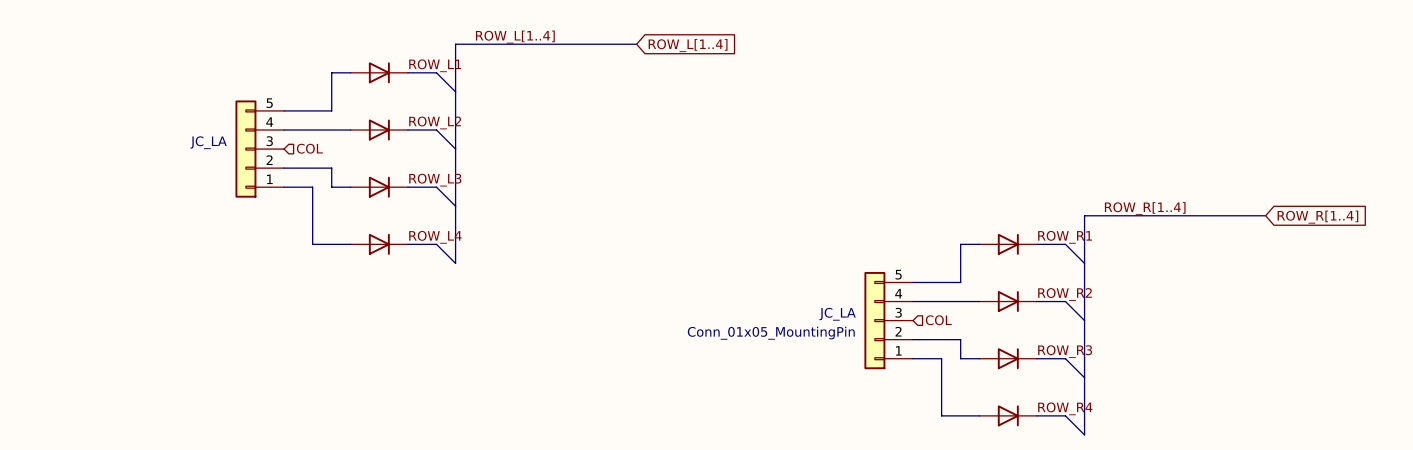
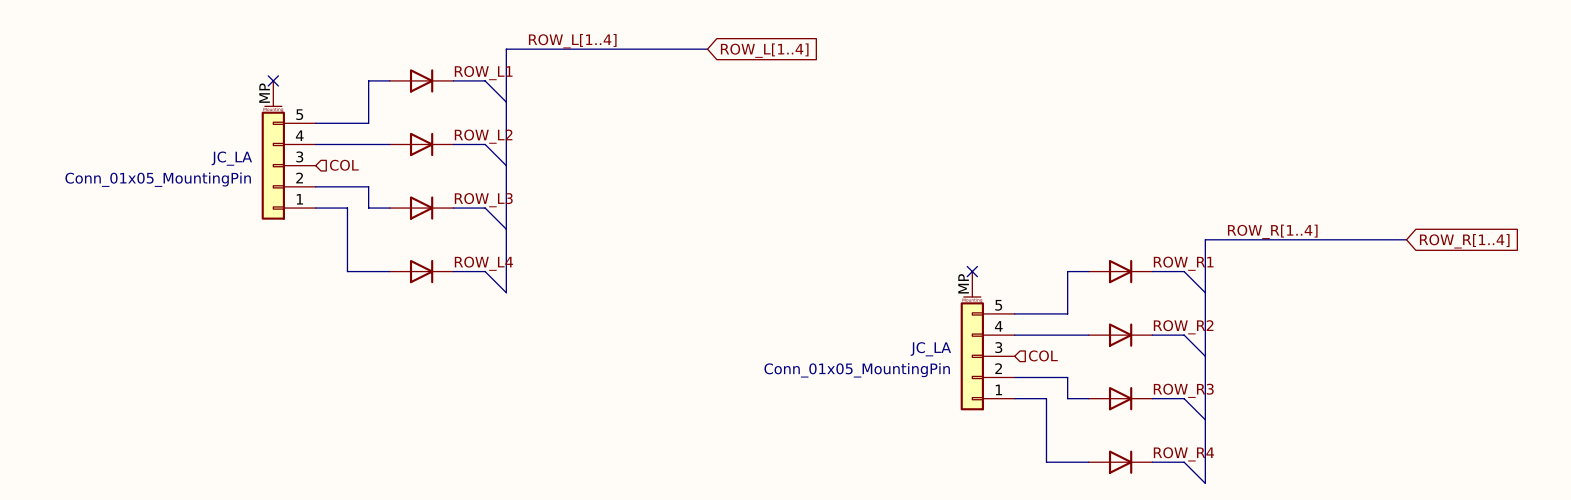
no-connect mark: none -> (273, 80)
JC_LA: none -> Conn_01x05_MountingPin (288, 150)
JC_LA: (259, 149) -> none
no-connect mark: none -> (972, 271)
JC_LA: none -> Conn_01x05_MountingPin (987, 340)
JC_LA: Conn_01x05_MountingPin (888, 320) -> none

